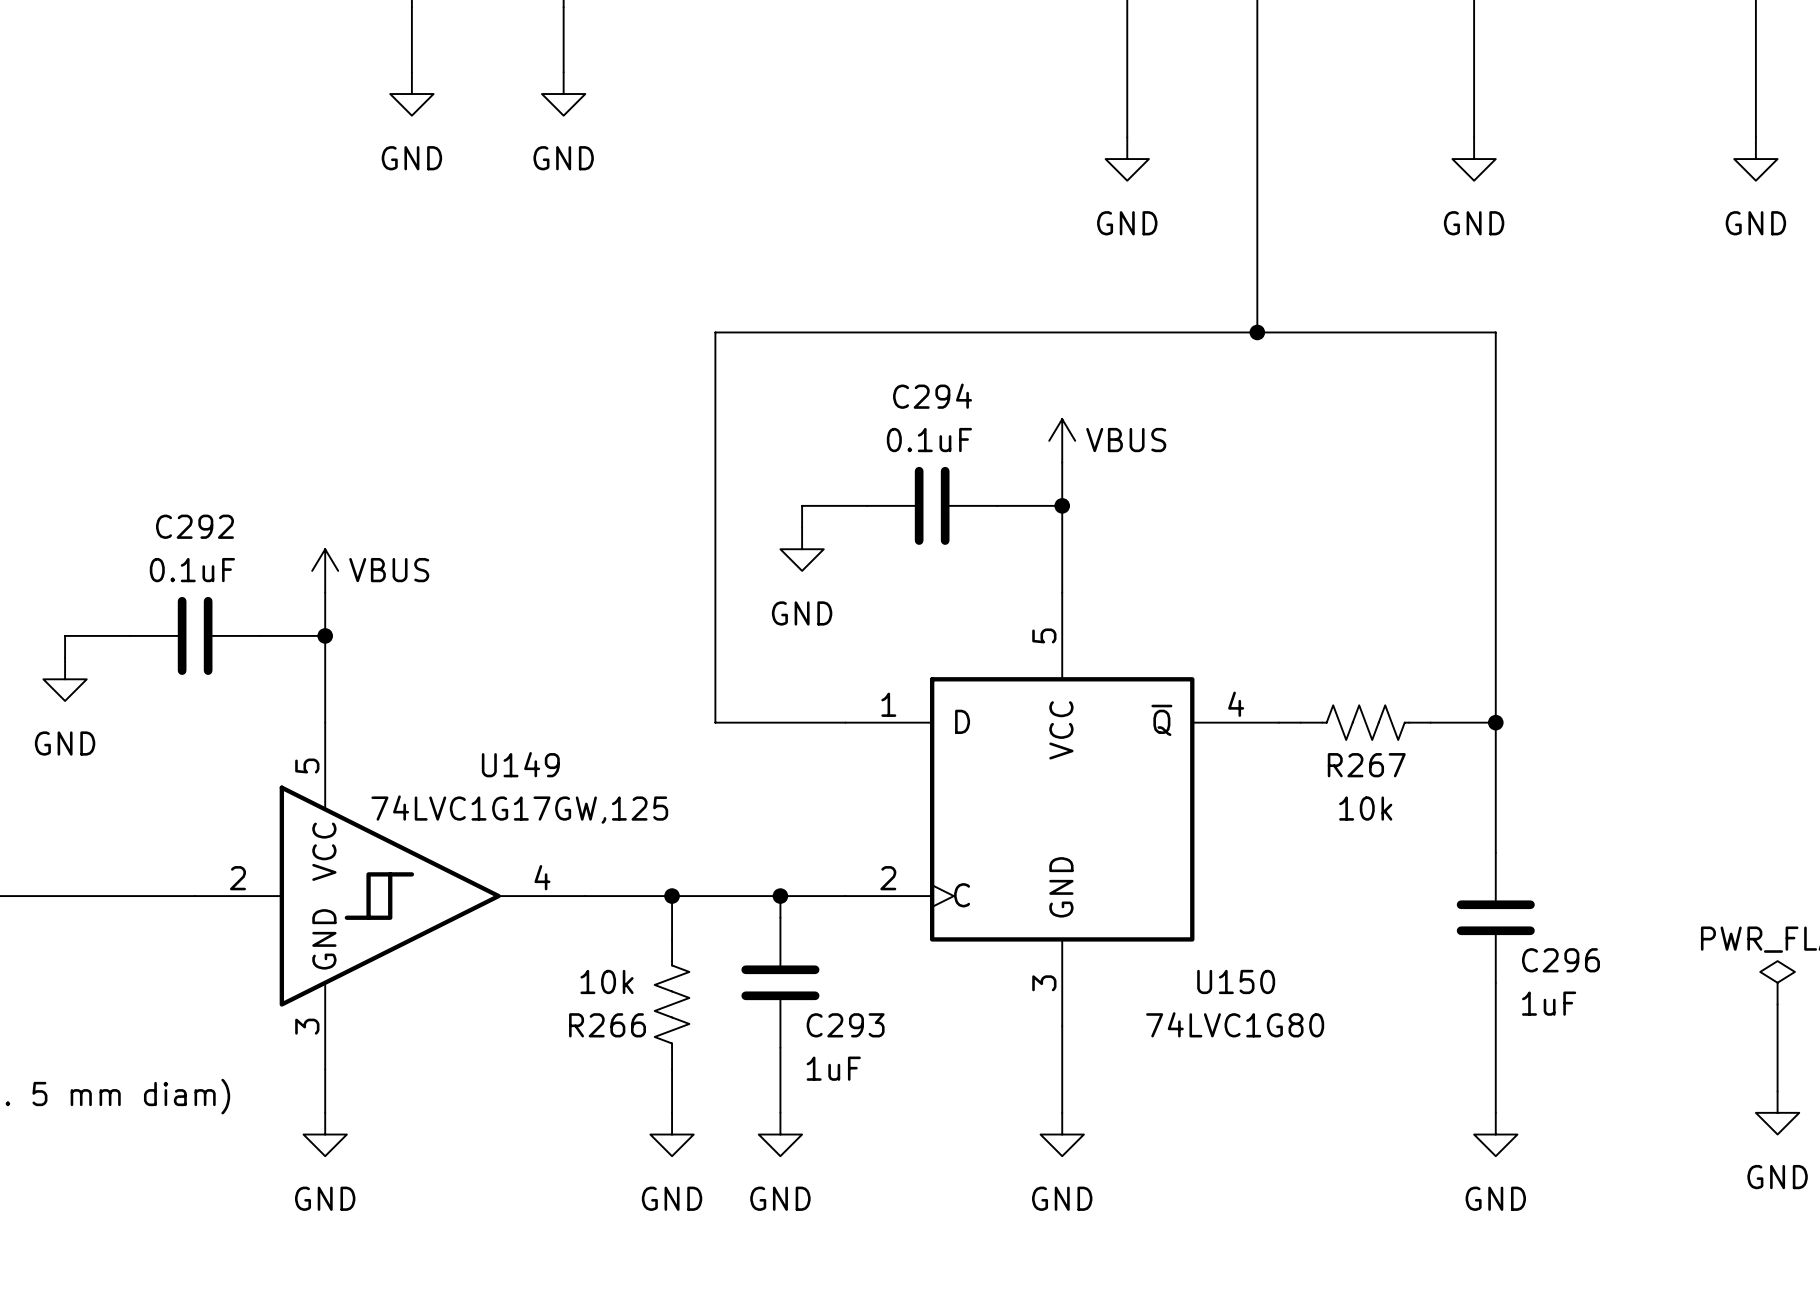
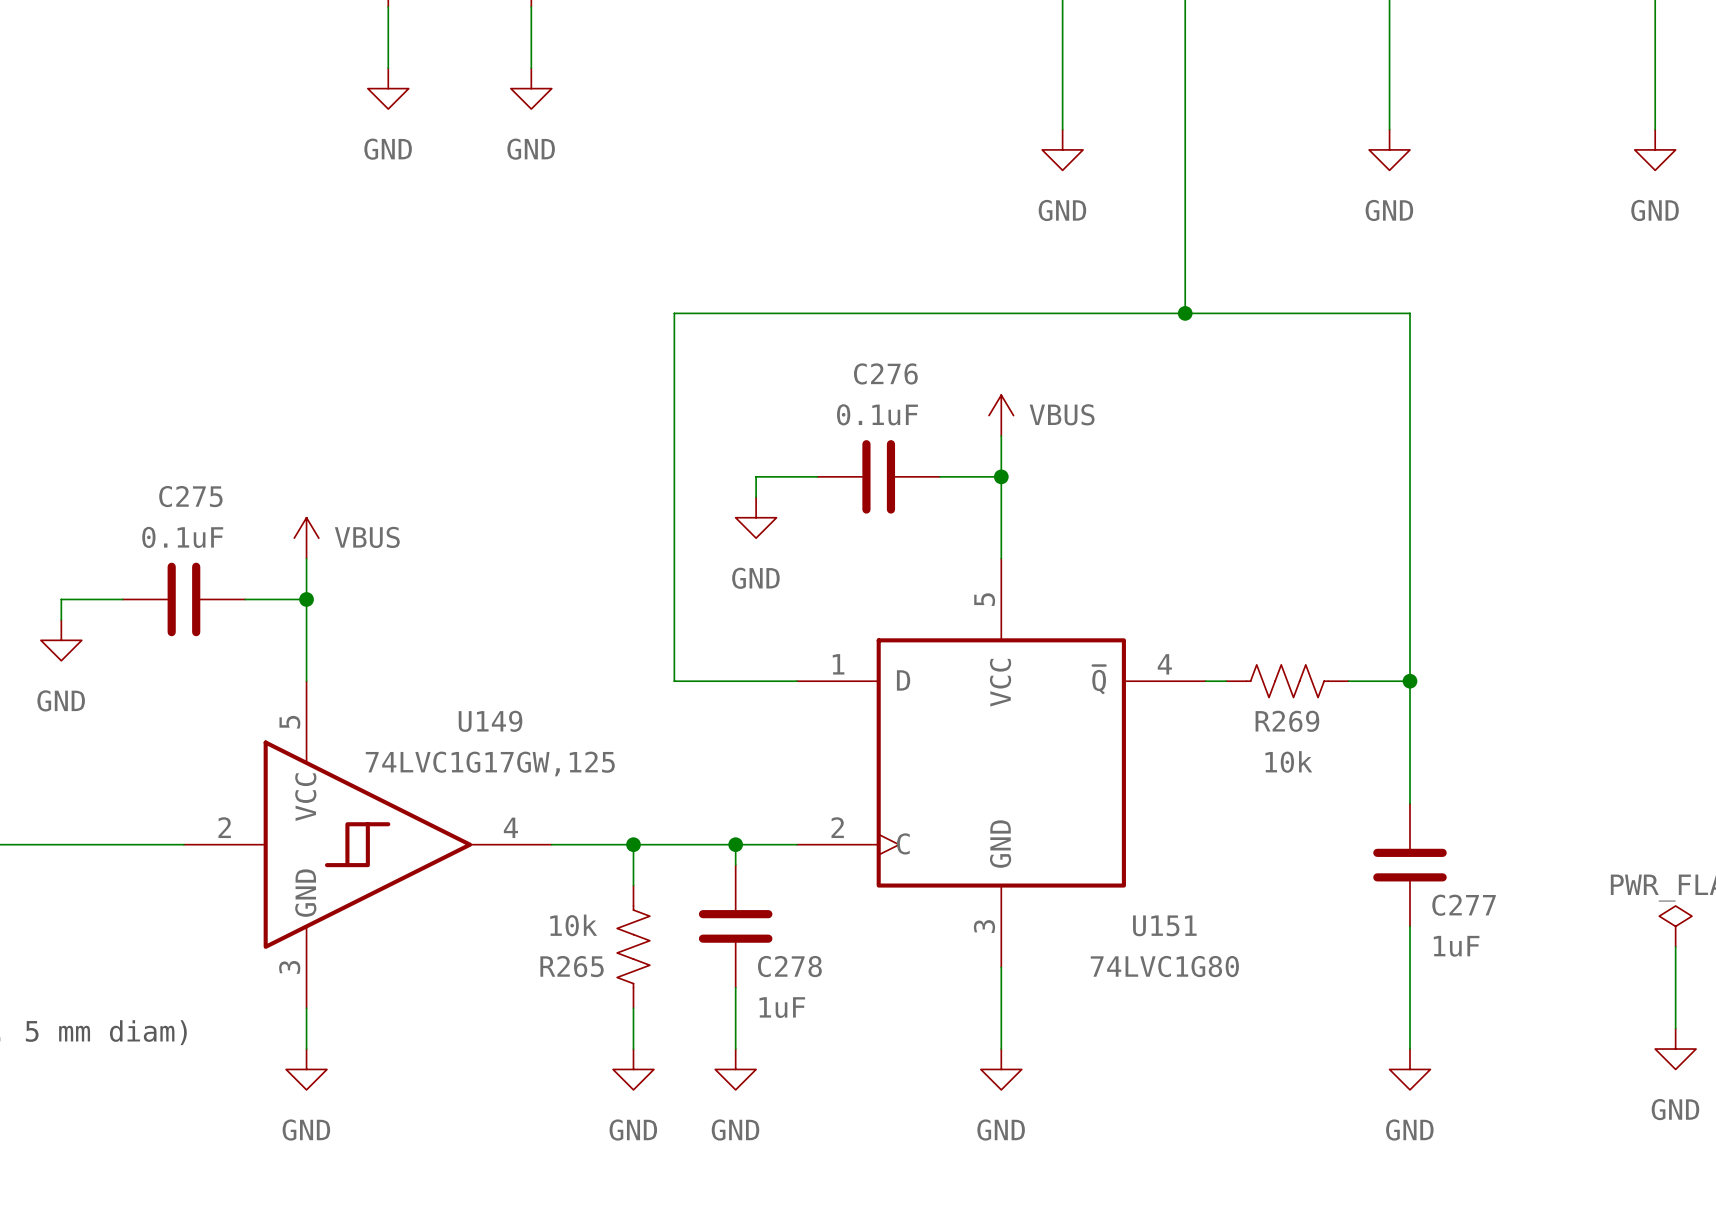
C294 name: C294 (932, 396) -> C276 (885, 373)
C292 name: C292 (194, 526) -> C275 (190, 496)
R267 name: R267 (1366, 765) -> R269 (1287, 721)
C296 name: C296 (1560, 960) -> C277 (1464, 905)
U150 name: U150 (1236, 981) -> U151 (1164, 925)
R266 name: R266 (607, 1025) -> R265 (572, 966)
C293 name: C293 (845, 1025) -> C278 (789, 966)

